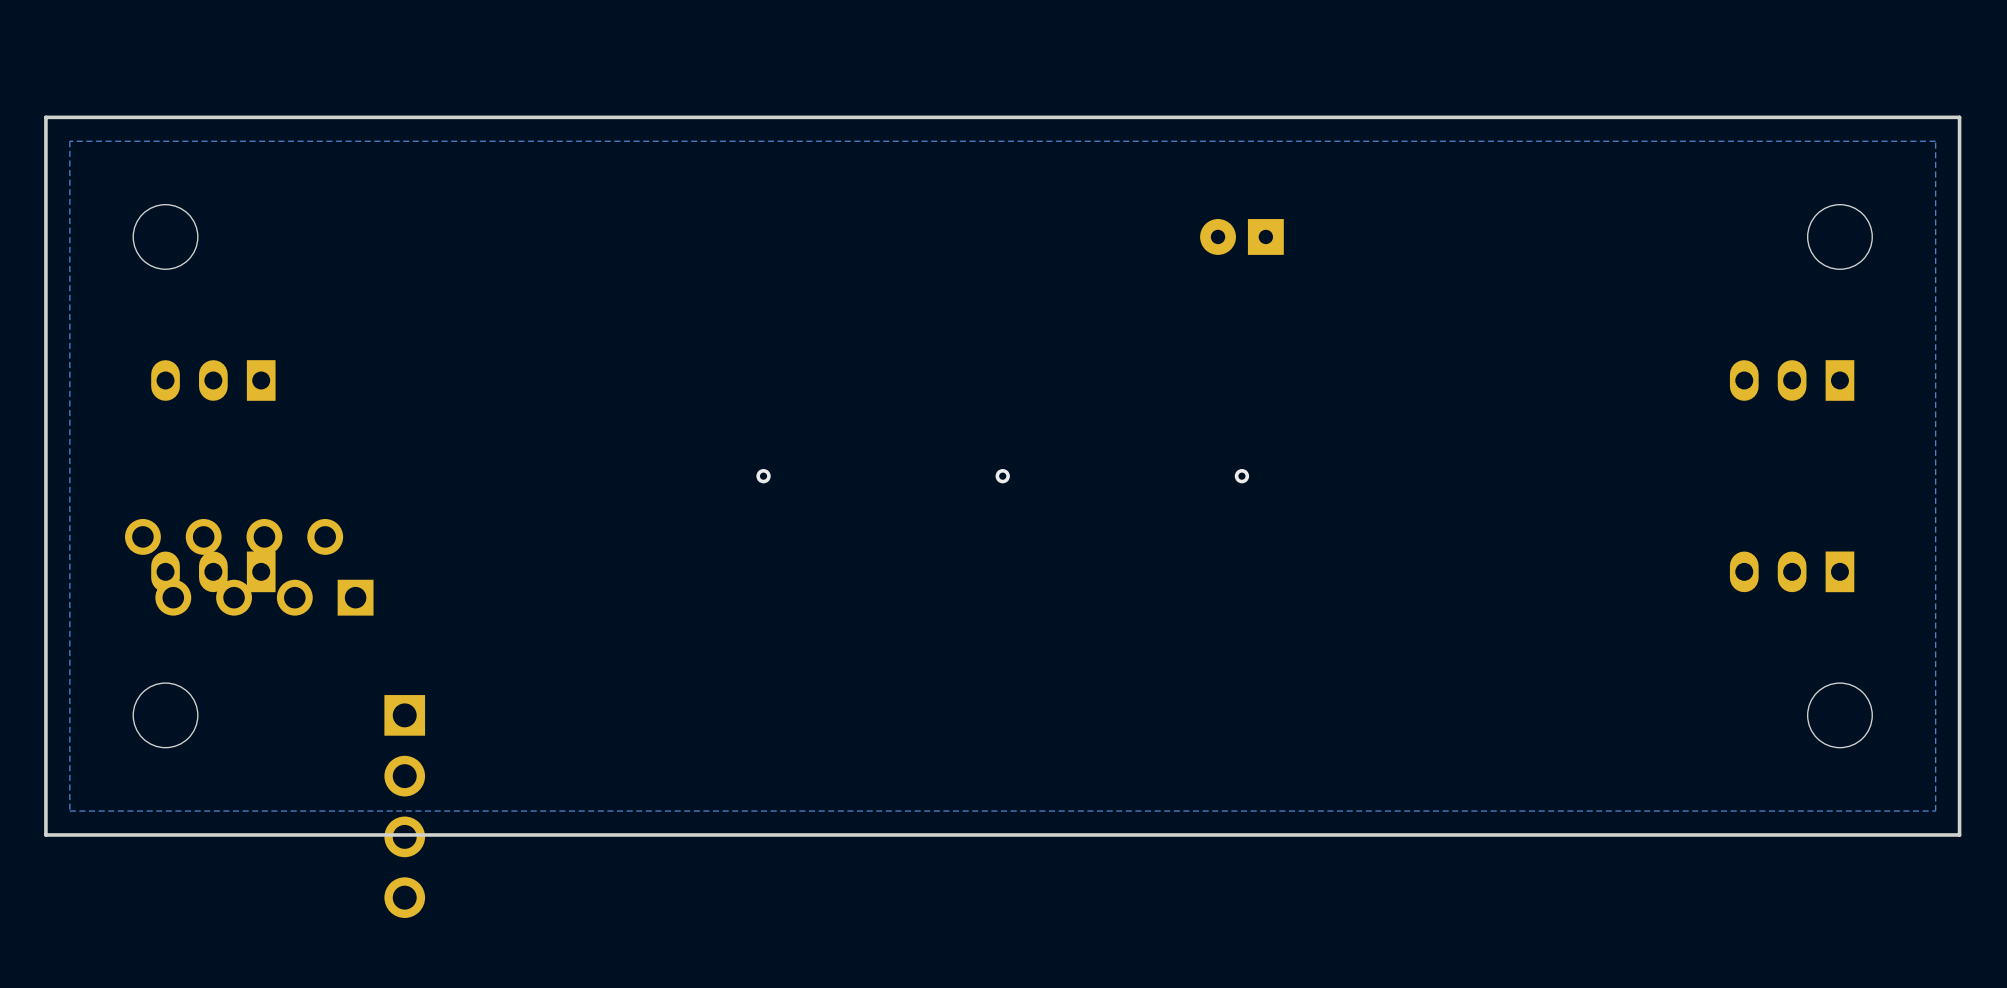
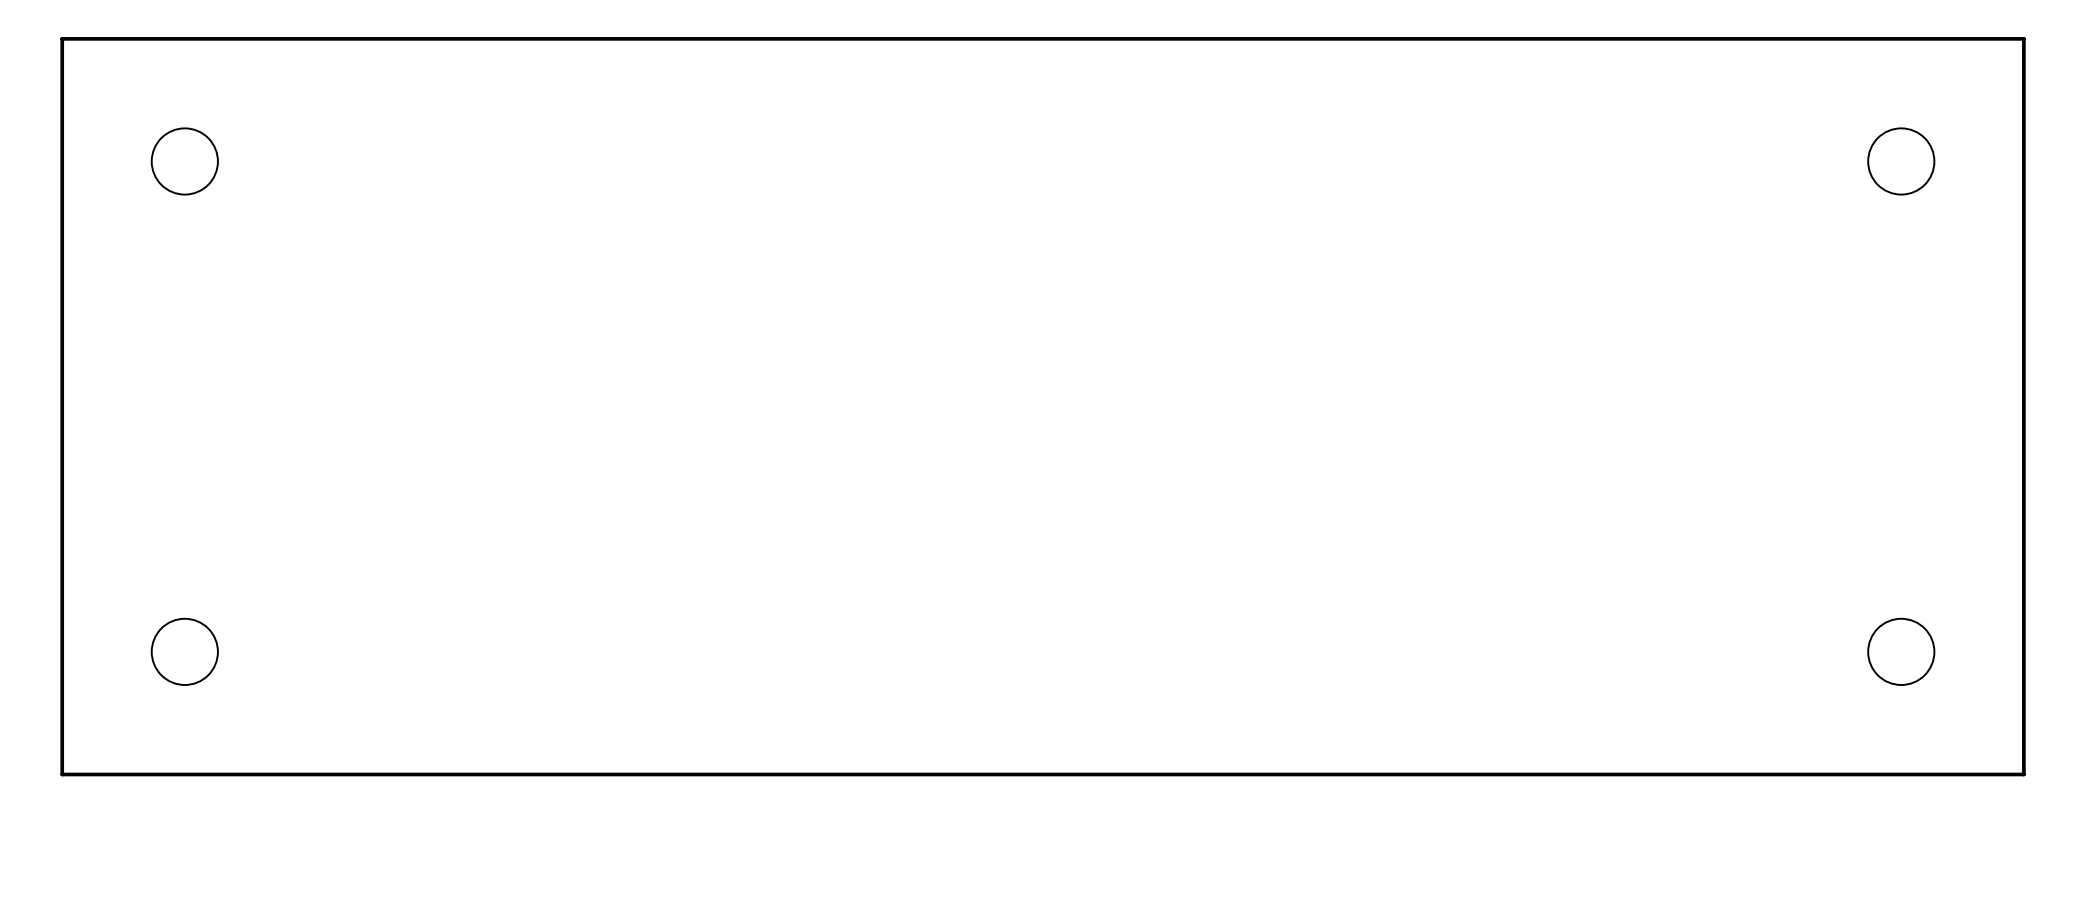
zone outline: (1935, 141) (69, 141) (69, 811) (1935, 811) (1935, 141) -> none
part: (1241, 236) -> none
part: (213, 380) -> none
part: (1792, 380) -> none
via: (763, 476) -> none
via: (1002, 476) -> none
via: (1241, 476) -> none
part: (249, 567) -> none
part: (213, 571) -> none
part: (1792, 571) -> none
part: (404, 806) -> none

